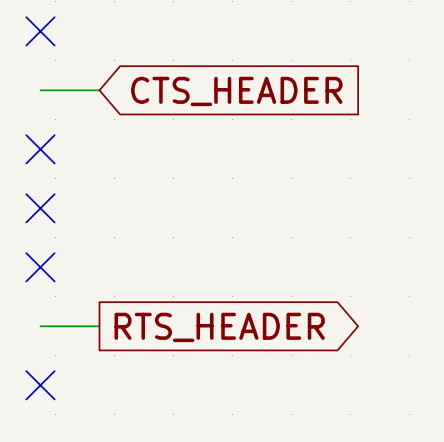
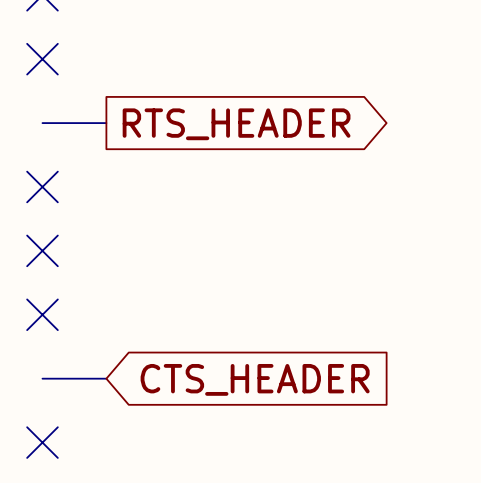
global label shape: input (236, 91) -> output (236, 124)
global label: CTS_HEADER (236, 91) -> RTS_HEADER (236, 124)
global label shape: output (219, 327) -> input (255, 379)
global label: RTS_HEADER (219, 327) -> CTS_HEADER (255, 379)

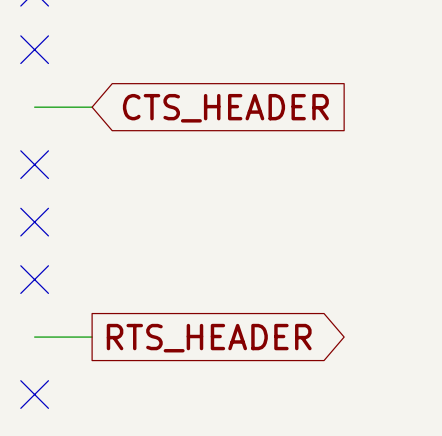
global label shape: output (236, 124) -> input (225, 108)
global label: RTS_HEADER (236, 124) -> CTS_HEADER (225, 108)
global label shape: input (255, 379) -> output (209, 338)
global label: CTS_HEADER (255, 379) -> RTS_HEADER (209, 338)

